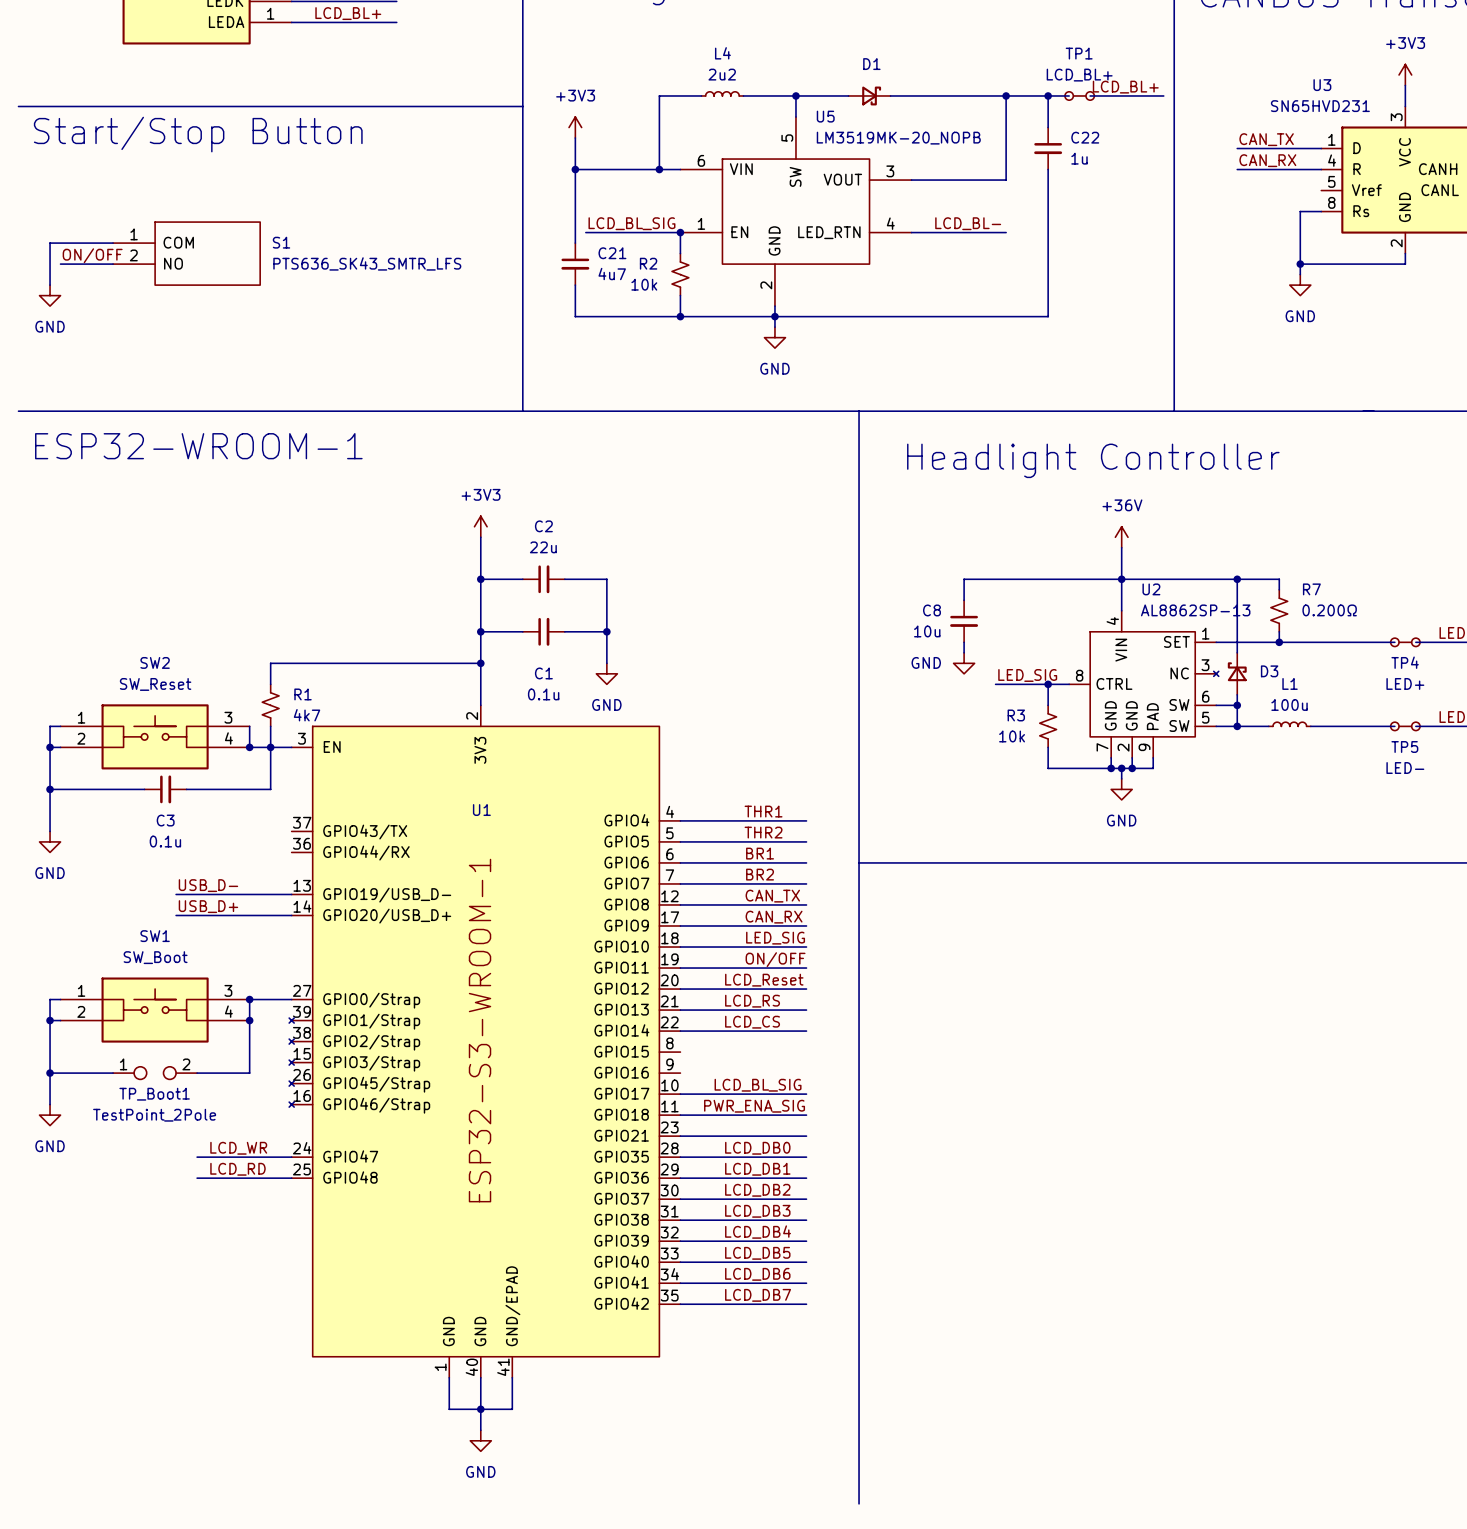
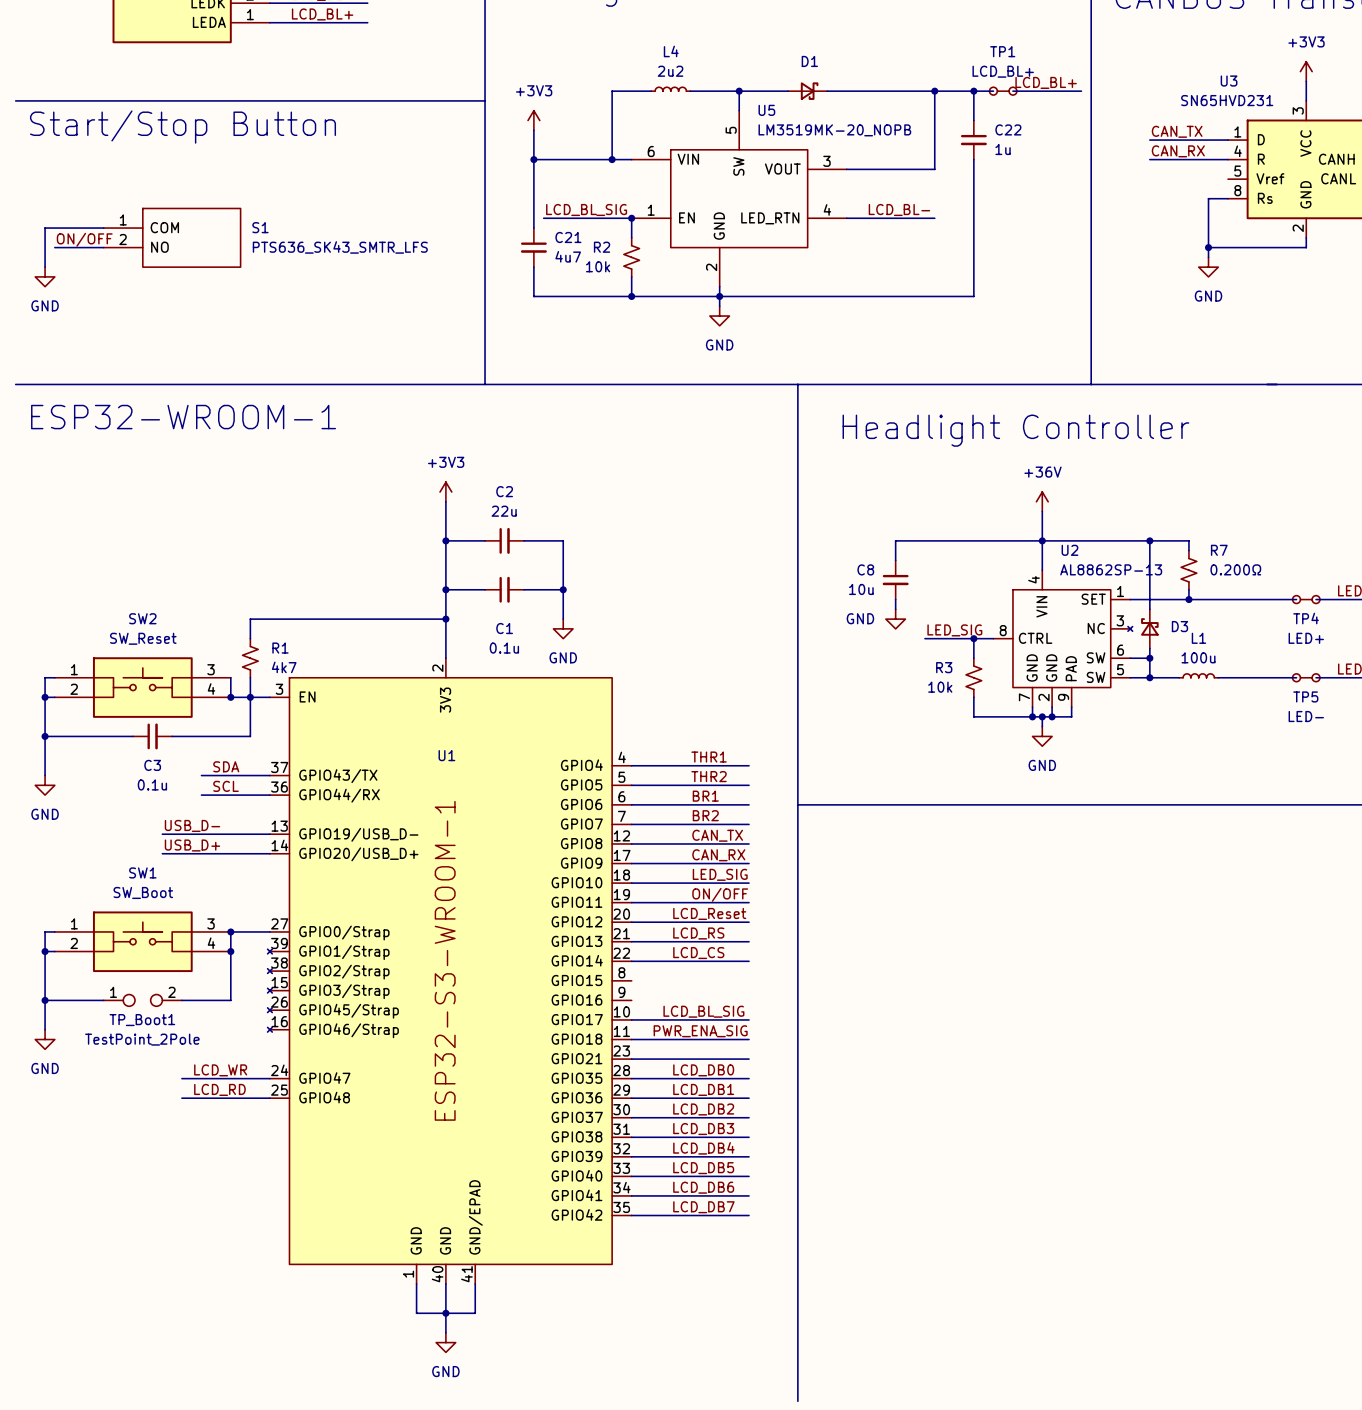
label: none -> SDA (226, 766)
wire: none -> (201, 775) (269, 775)
label: none -> SCL (226, 786)
wire: none -> (201, 795) (269, 795)

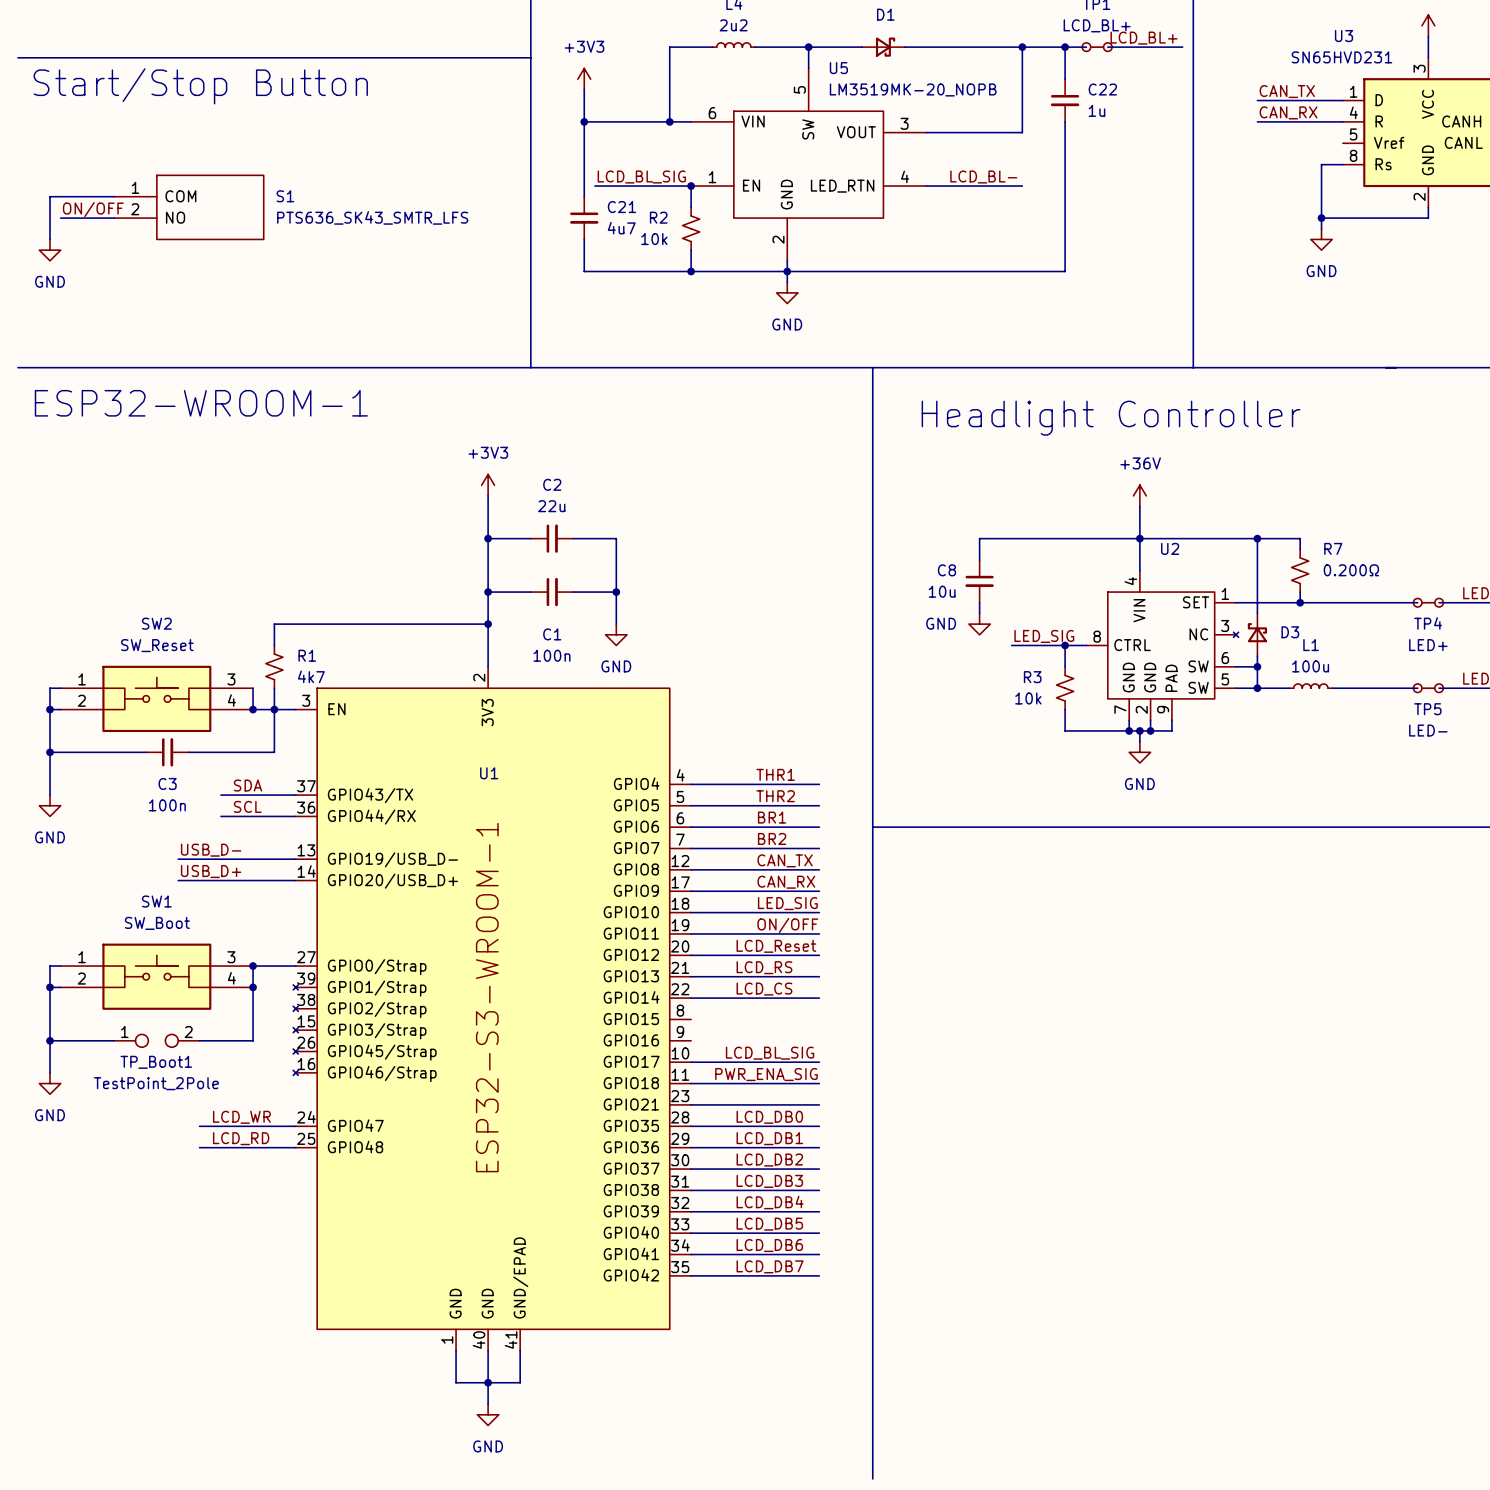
U2 text: AL8862SP-13 (1111, 569) -> none
C1 value: 0.1u (504, 648) -> 100n (552, 655)
C3 value: 0.1u (152, 784) -> 100n (167, 805)

